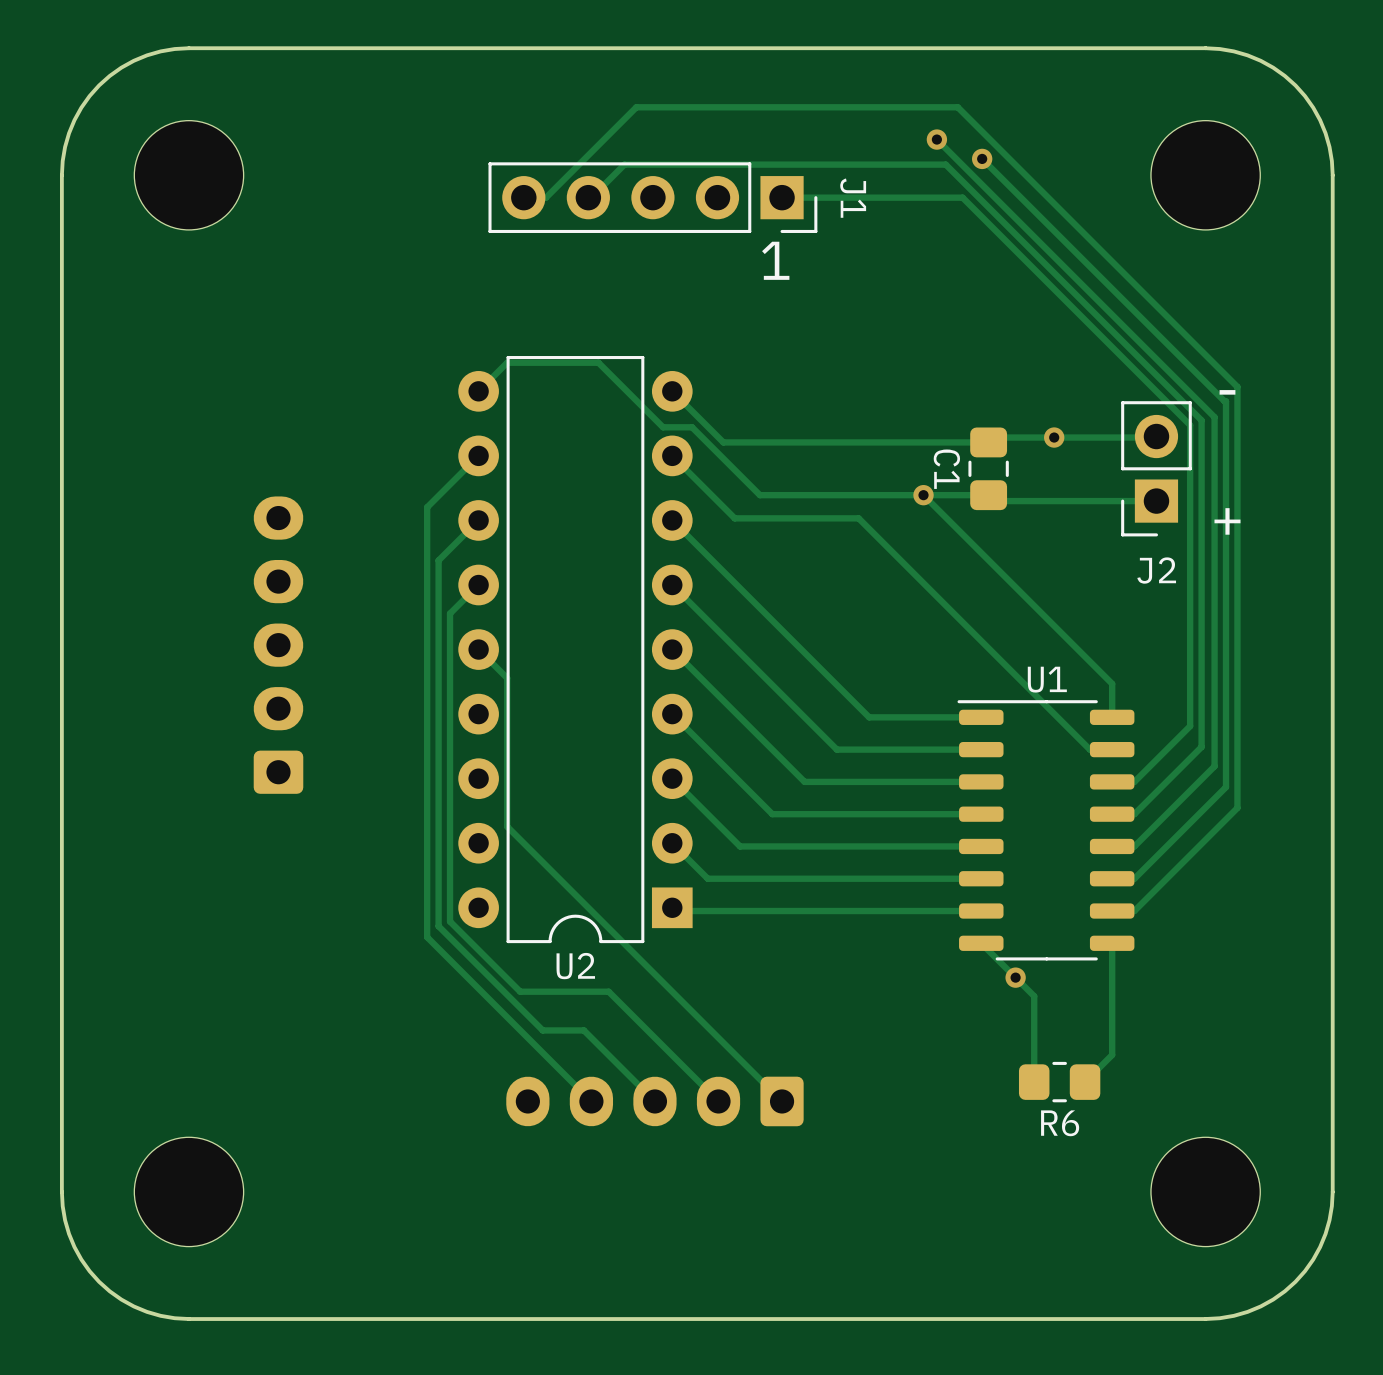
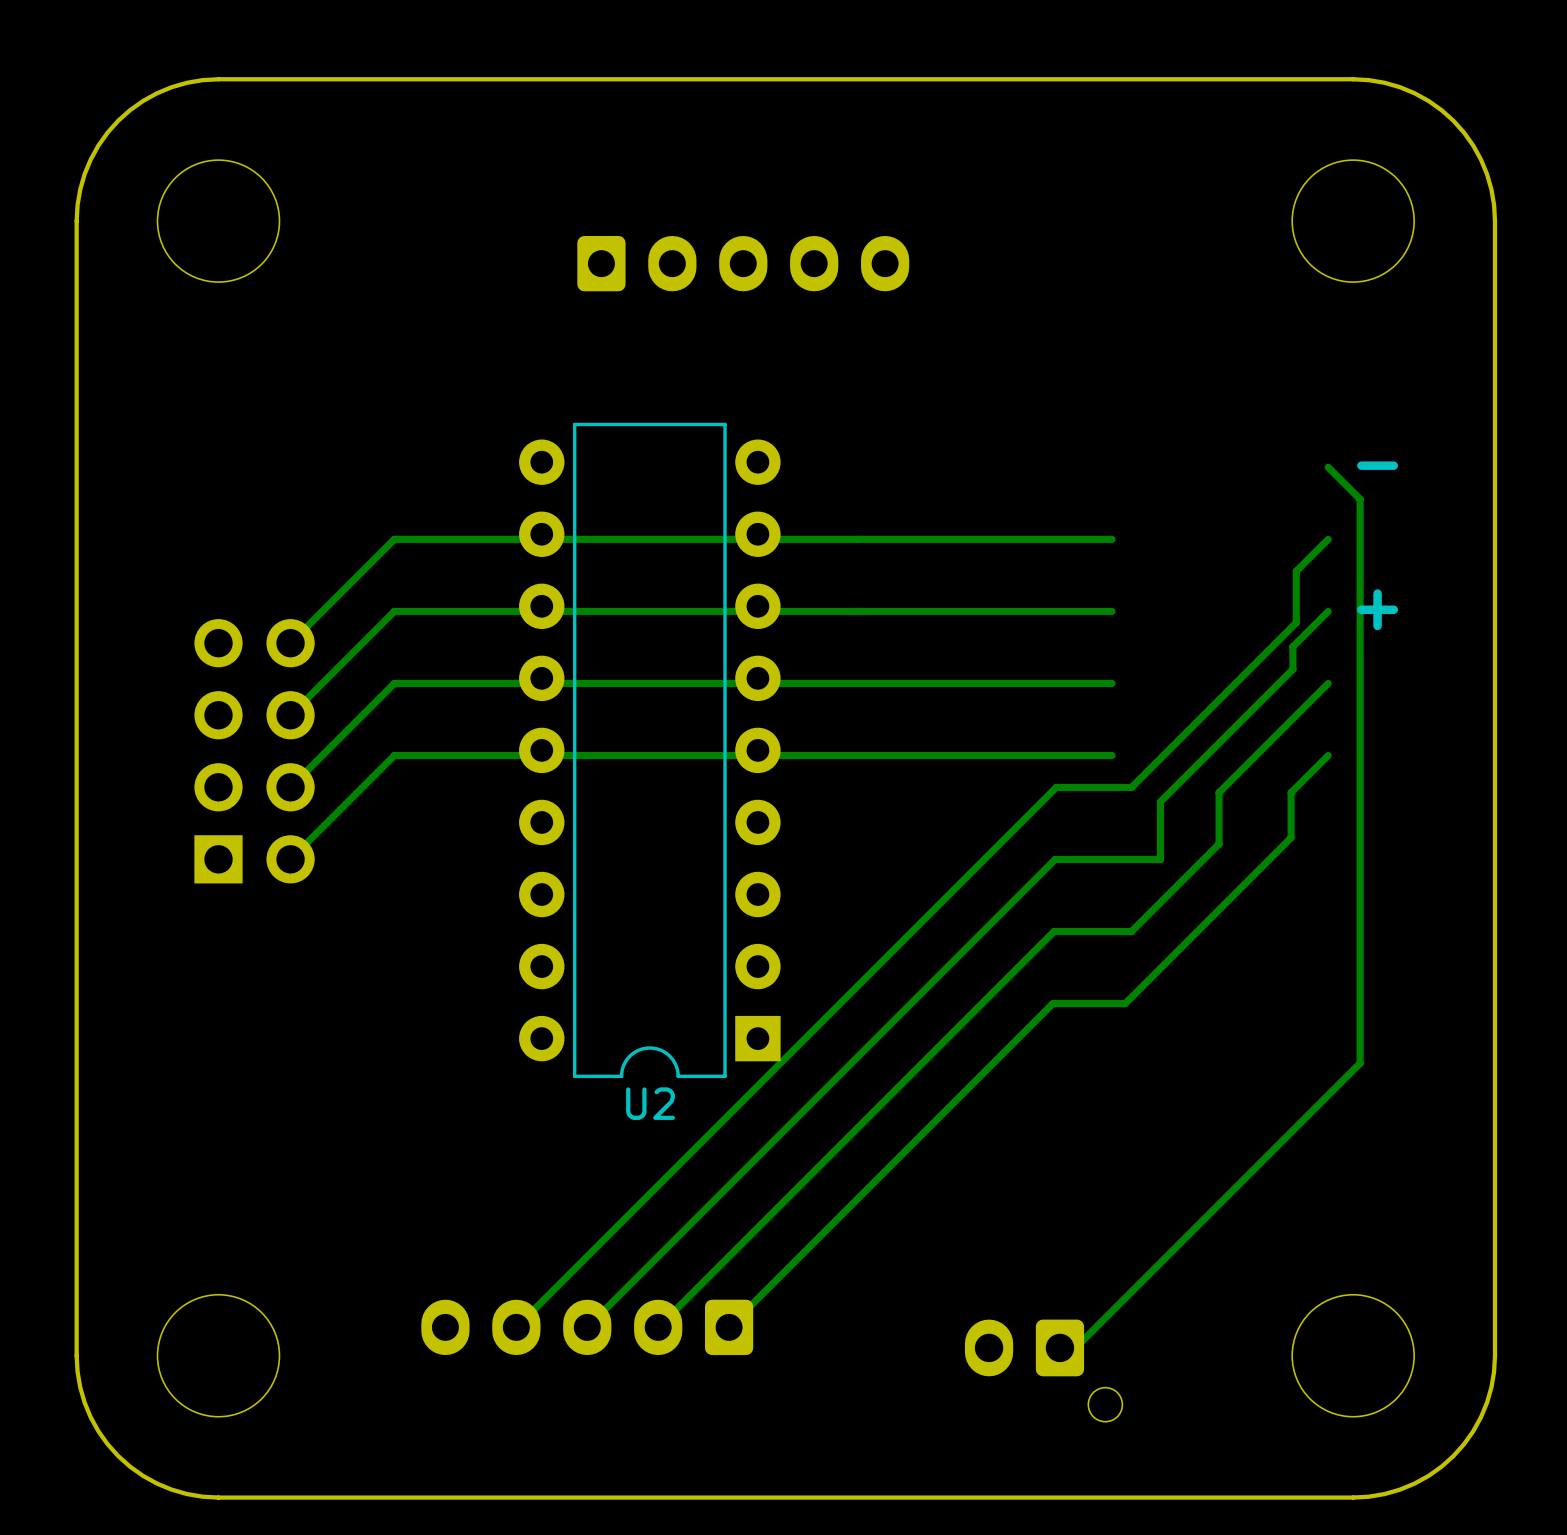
track: (936, 139) (1214, 417) (1214, 766) (1134, 846) (1112, 846) -> none
via: (936, 139) -> none
track: (982, 158) (1226, 401) (1226, 787) (1134, 878) (1112, 878) -> none
via: (982, 158) -> none
track: (527, 197) (546, 197) (636, 107) (957, 107) (1237, 386) (1237, 807) (1134, 911) (1112, 911) -> none
track: (591, 197) (624, 164) (945, 164) (1201, 420) (1201, 747) (1134, 814) (1112, 814) -> none
J1: (652, 197) -> none
track: (782, 197) (962, 197) (1190, 425) (1190, 726) (1134, 781) (1112, 781) -> none
part: none -> (743, 263)
text: 1 (775, 260) -> none
track: (478, 391) (507, 362) (598, 362) (663, 427) (692, 427) (759, 495) (988, 495) (994, 501) (1156, 501) -> none
track: (672, 391) (723, 442) (988, 442) (993, 437) (1156, 437) -> none
track: none -> (1328, 467) (1360, 499) (1360, 1063) (1075, 1347) (1059, 1347)
via: (1054, 437) -> none
track: (478, 455) (427, 507) (427, 937) (591, 1101) -> none
track: (672, 455) (734, 518) (858, 518) (1089, 749) (1112, 749) -> none
track: none -> (1112, 539) (394, 539) (290, 643)
track: none -> (1328, 539) (1296, 571) (1296, 622) (1131, 787) (1056, 787) (516, 1327)
C1: (988, 468) -> none
J2: (1156, 468) -> none
track: (923, 495) (1112, 683) (1112, 717) -> none
via: (923, 495) -> none
track: (478, 520) (438, 560) (438, 926) (542, 1030) (583, 1030) (654, 1101) -> none
track: (672, 520) (869, 717) (981, 717) -> none
track: none -> (1112, 611) (394, 611) (290, 715)
track: none -> (1328, 611) (1292, 646) (1292, 669) (1160, 801) (1160, 859) (1055, 859) (587, 1327)
track: (478, 585) (450, 613) (450, 921) (520, 991) (608, 991) (718, 1101) -> none
track: (672, 585) (836, 749) (981, 749) -> none
track: none -> (1112, 683) (394, 683) (290, 787)
track: none -> (1328, 683) (1219, 792) (1219, 844) (1131, 931) (1054, 931) (658, 1327)
part: (278, 645) -> none
track: (478, 649) (507, 678) (507, 826) (782, 1101) -> none
track: (672, 649) (804, 781) (981, 781) -> none
part: none -> (254, 751)
track: none -> (1112, 755) (394, 755) (290, 859)
track: none -> (1328, 755) (1291, 792) (1291, 837) (1125, 1003) (1052, 1003) (729, 1327)
track: (672, 714) (772, 814) (981, 814) -> none
track: (672, 778) (740, 846) (981, 846) -> none
U1: (1045, 830) -> none
track: (672, 843) (707, 878) (981, 878) -> none
track: (672, 907) (675, 911) (981, 911) -> none
track: (981, 943) (1034, 996) (1034, 1082) -> none
track: (1112, 943) (1112, 1054) (1085, 1082) -> none
via: (1015, 977) -> none
R6: (1059, 1082) -> none
part position: (654, 1101) -> (587, 1327)
part: none -> (1043, 1370)

